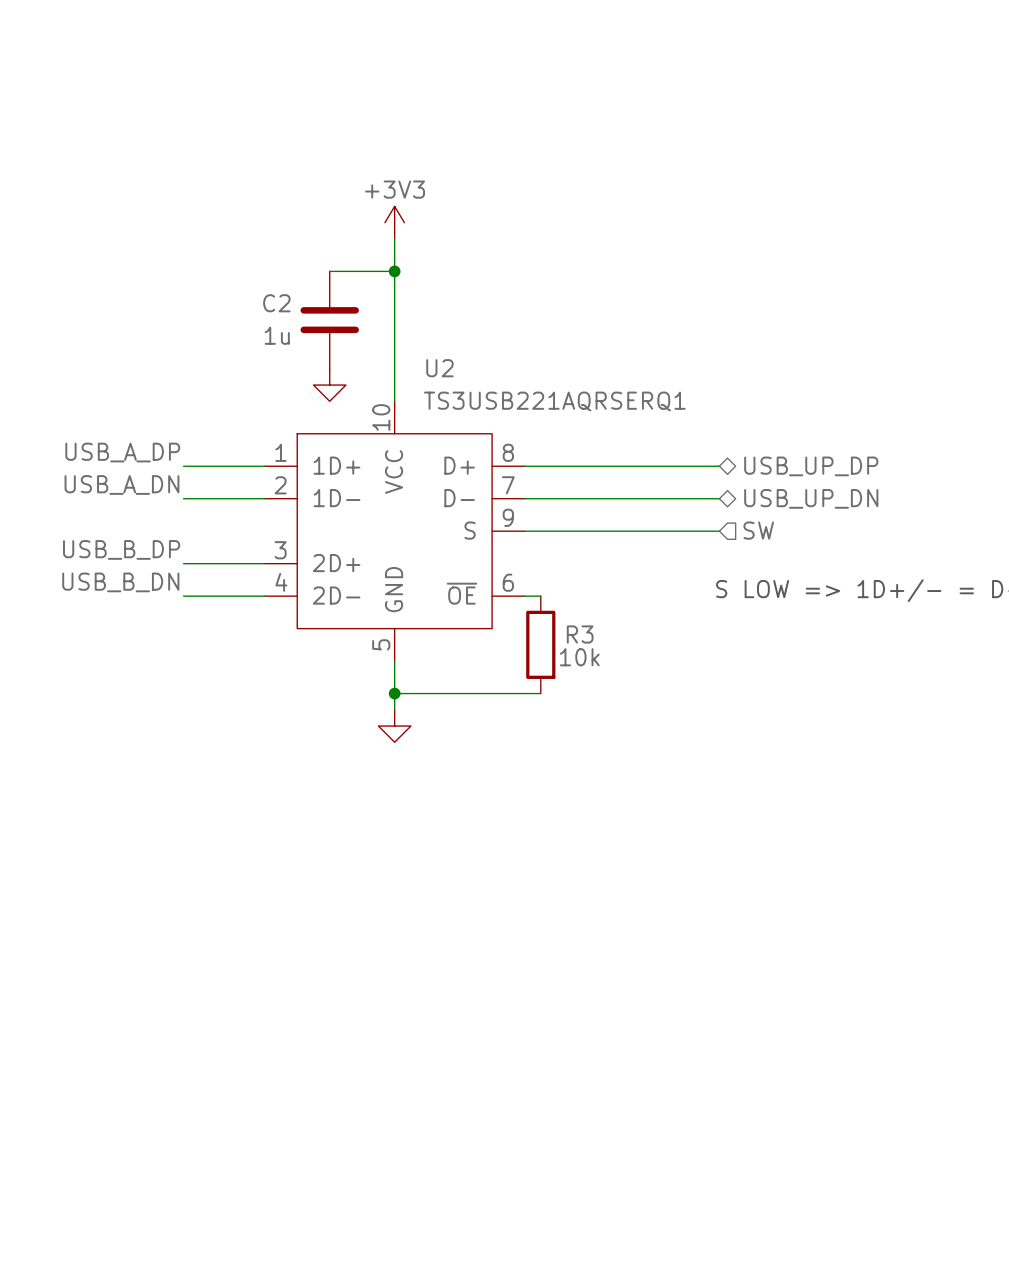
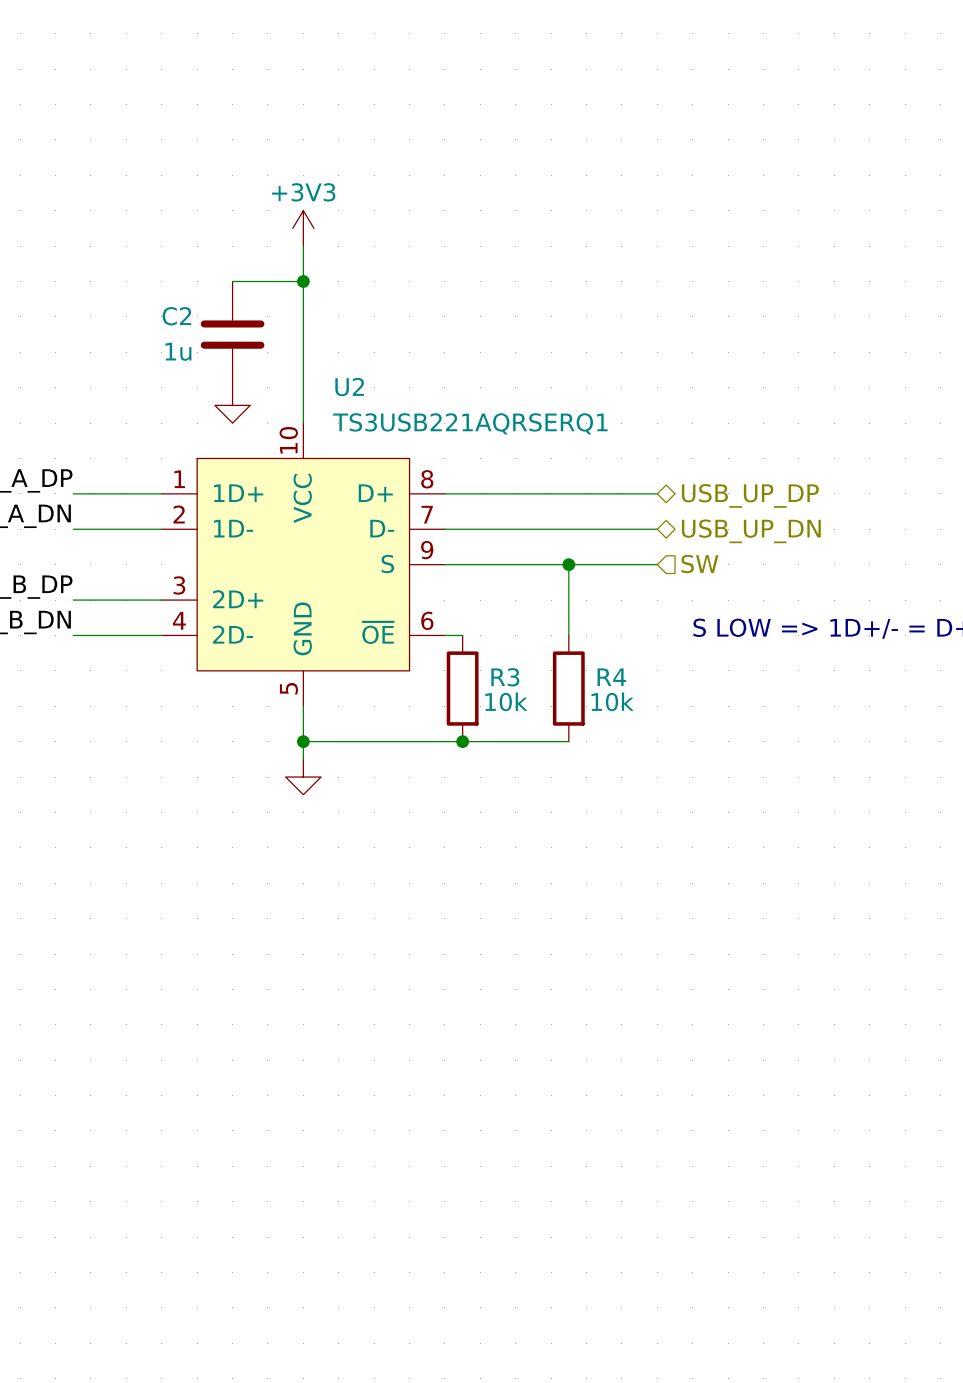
wire: none -> (568, 564) (568, 635)
junction: none -> (568, 564)
R4: none -> 10k (568, 688)
wire: none -> (462, 741) (568, 741)
junction: none -> (462, 741)

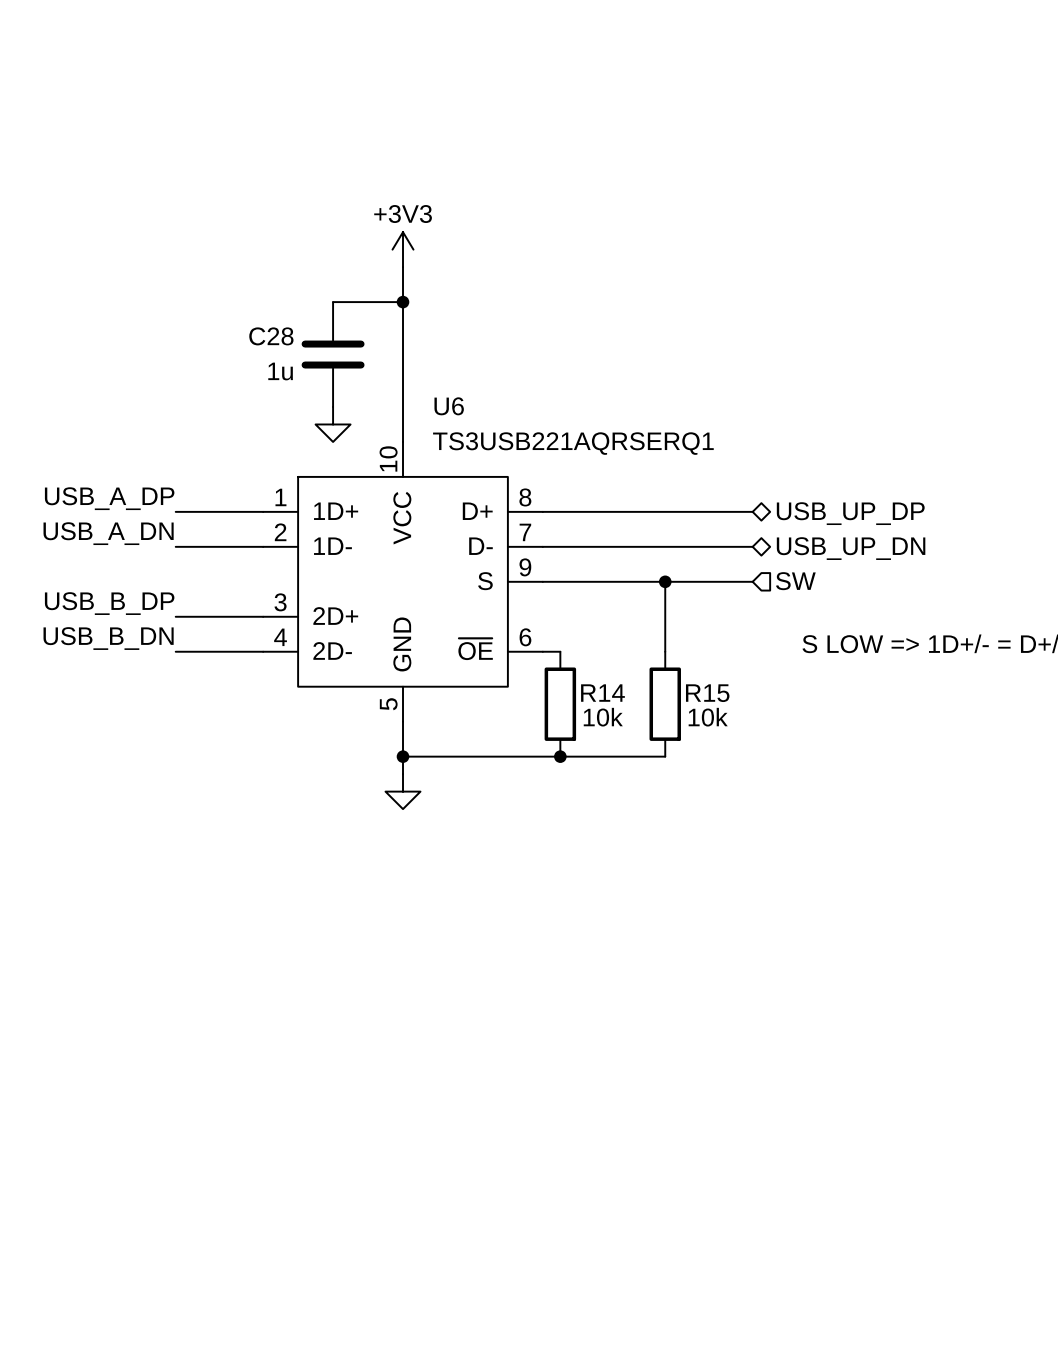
C2 name: C2 (176, 316) -> C28 (271, 336)
U2 name: U2 (349, 387) -> U6 (449, 406)
R3 name: R3 (505, 677) -> R14 (602, 693)
R4 name: R4 (611, 677) -> R15 (707, 693)

